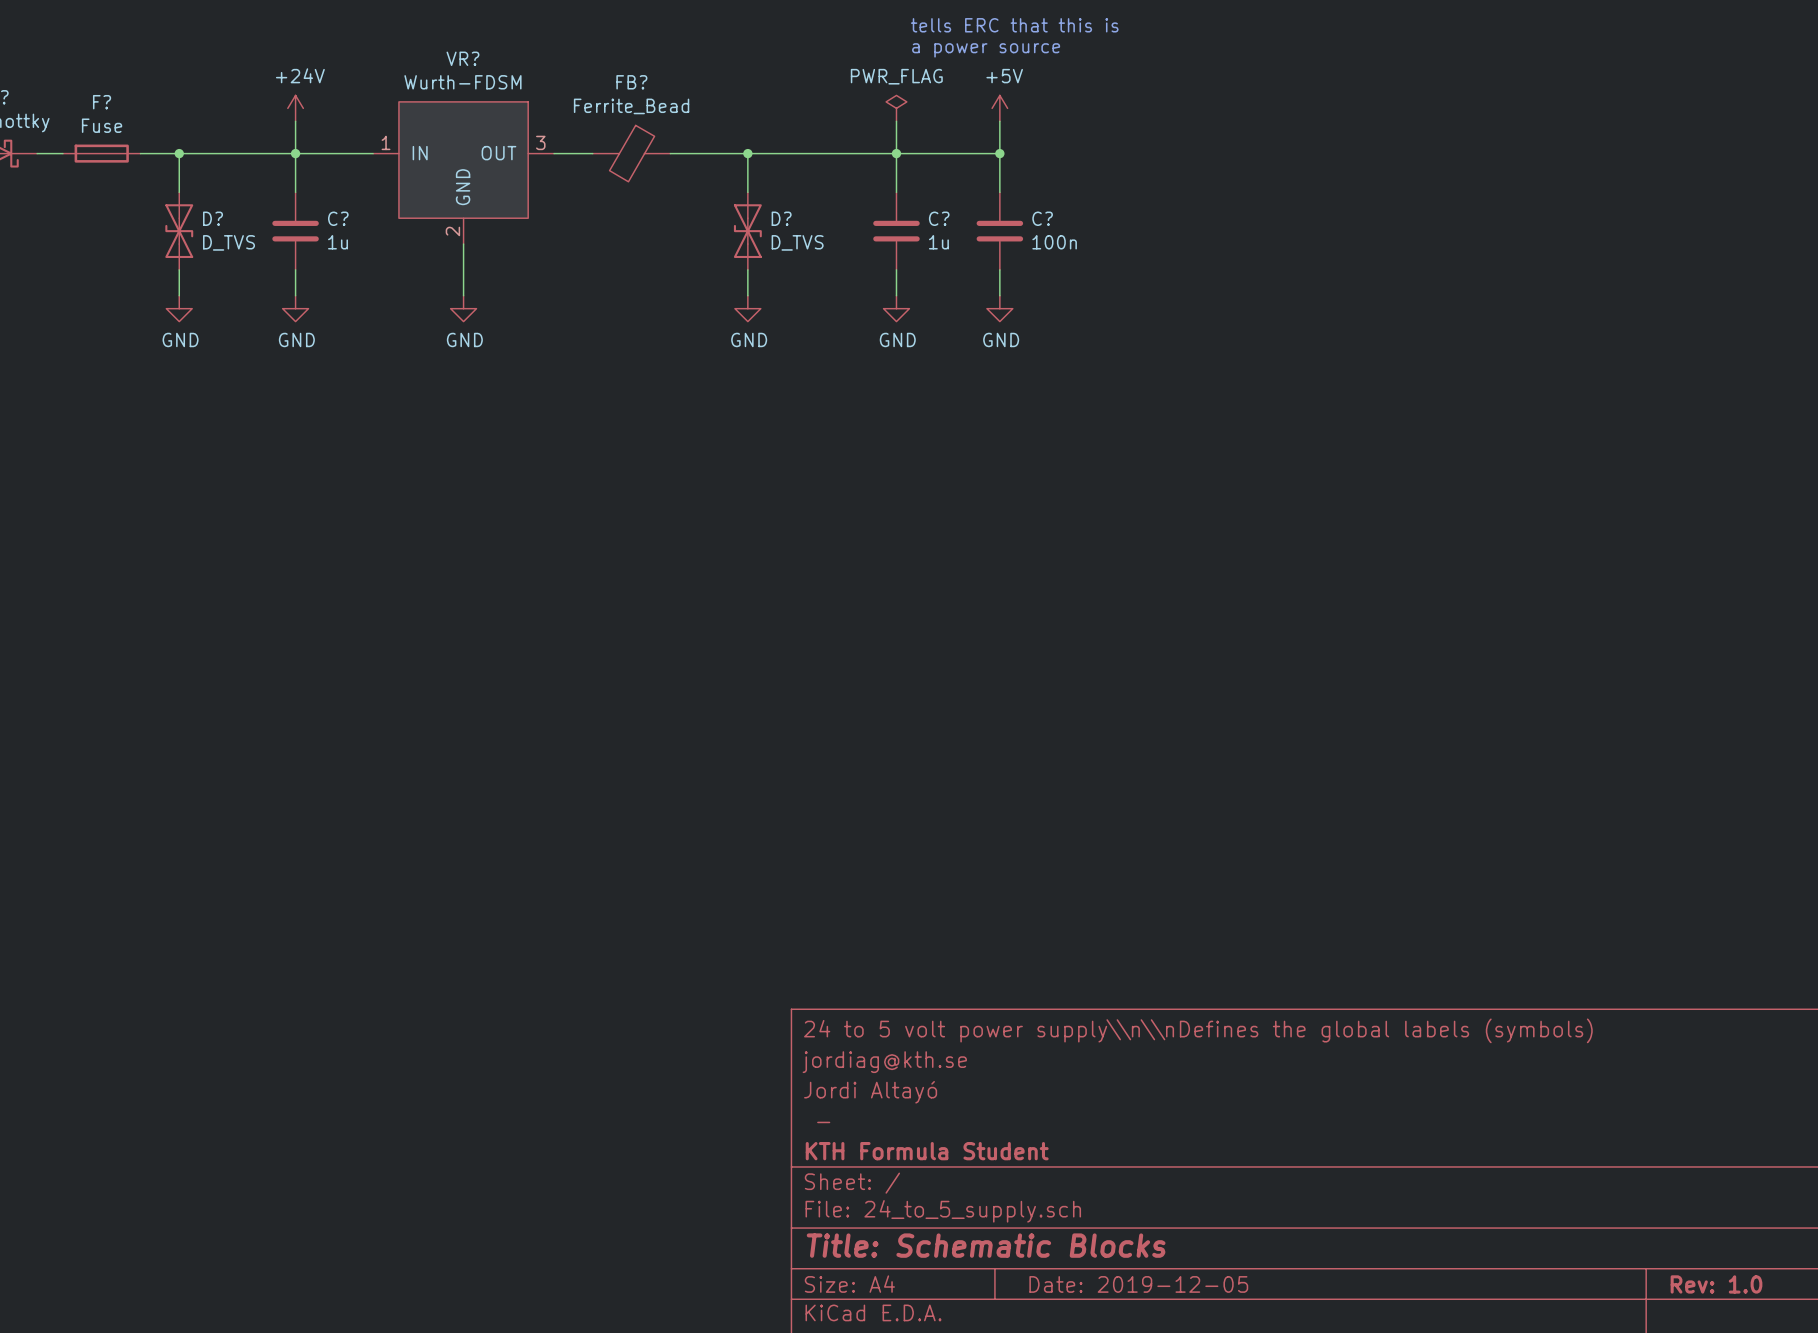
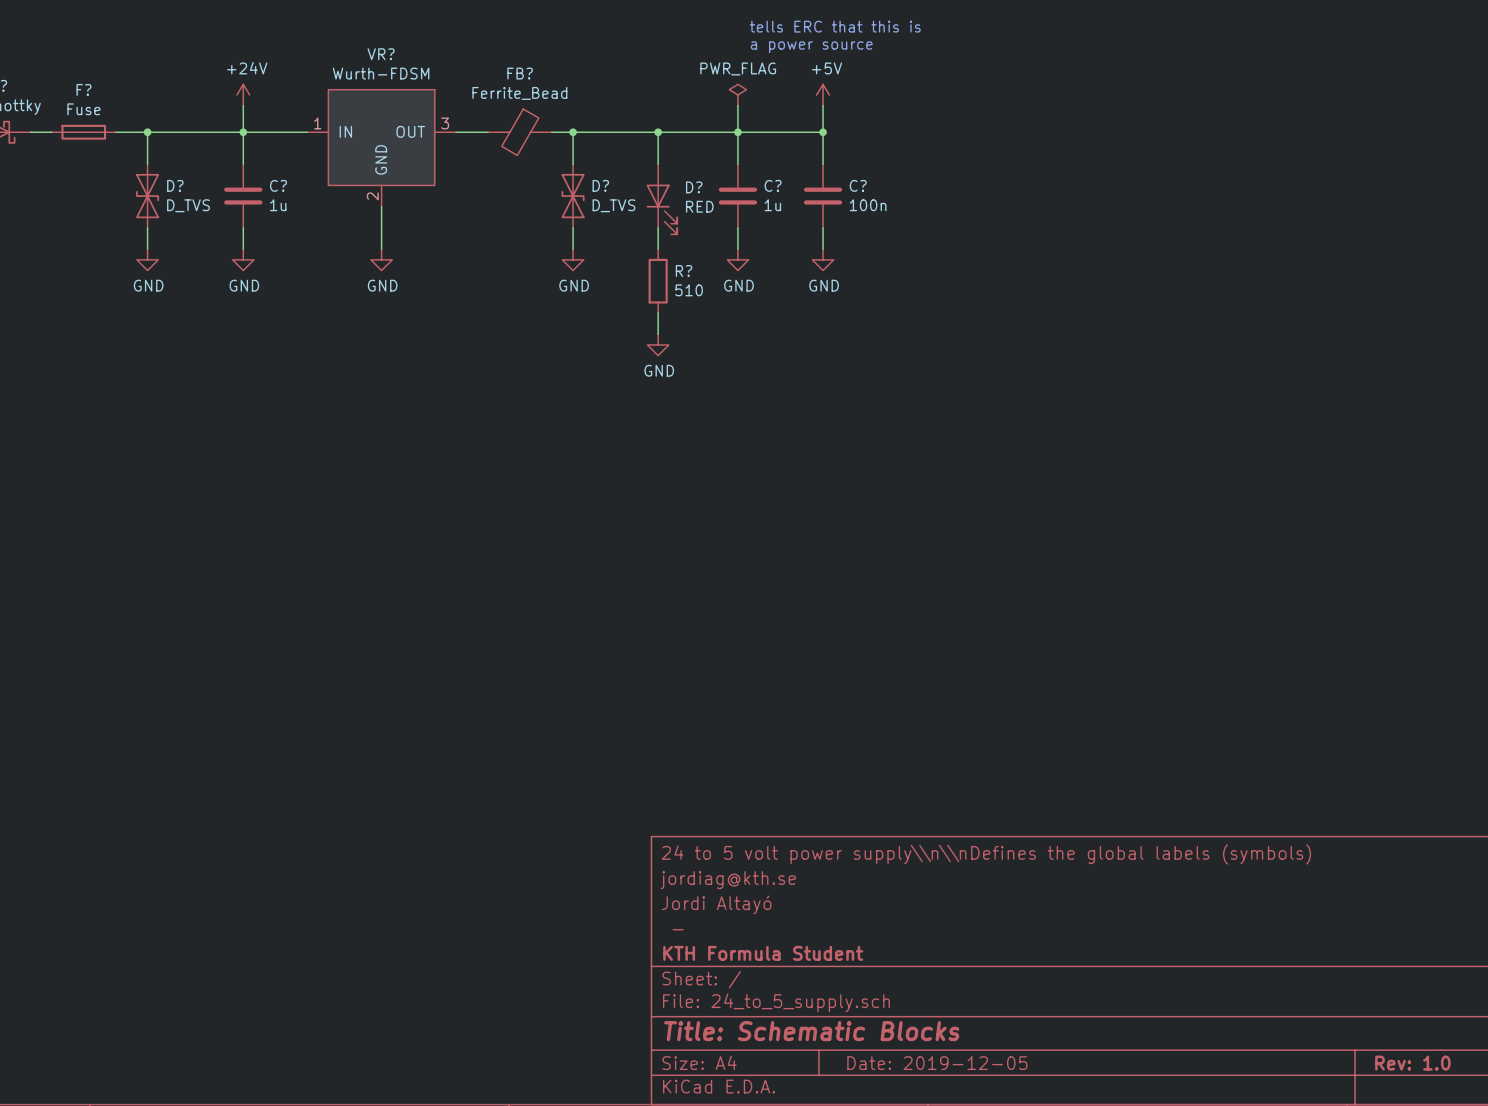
junction: none -> (573, 132)
wire: (747, 153) (747, 192) -> (573, 132) (573, 164)
junction: (747, 153) -> none
wire: none -> (658, 132) (658, 164)
junction: none -> (658, 132)
D? position: (747, 231) -> (573, 196)
D?: none -> RED (661, 199)
wire: (747, 269) (747, 295) -> (573, 227) (573, 249)
wire: none -> (658, 227) (658, 249)
power symbol position: GND (747, 308) -> GND (573, 259)
R?: none -> 510 (658, 281)
wire: none -> (658, 313) (658, 334)
power symbol: none -> GND (658, 345)

